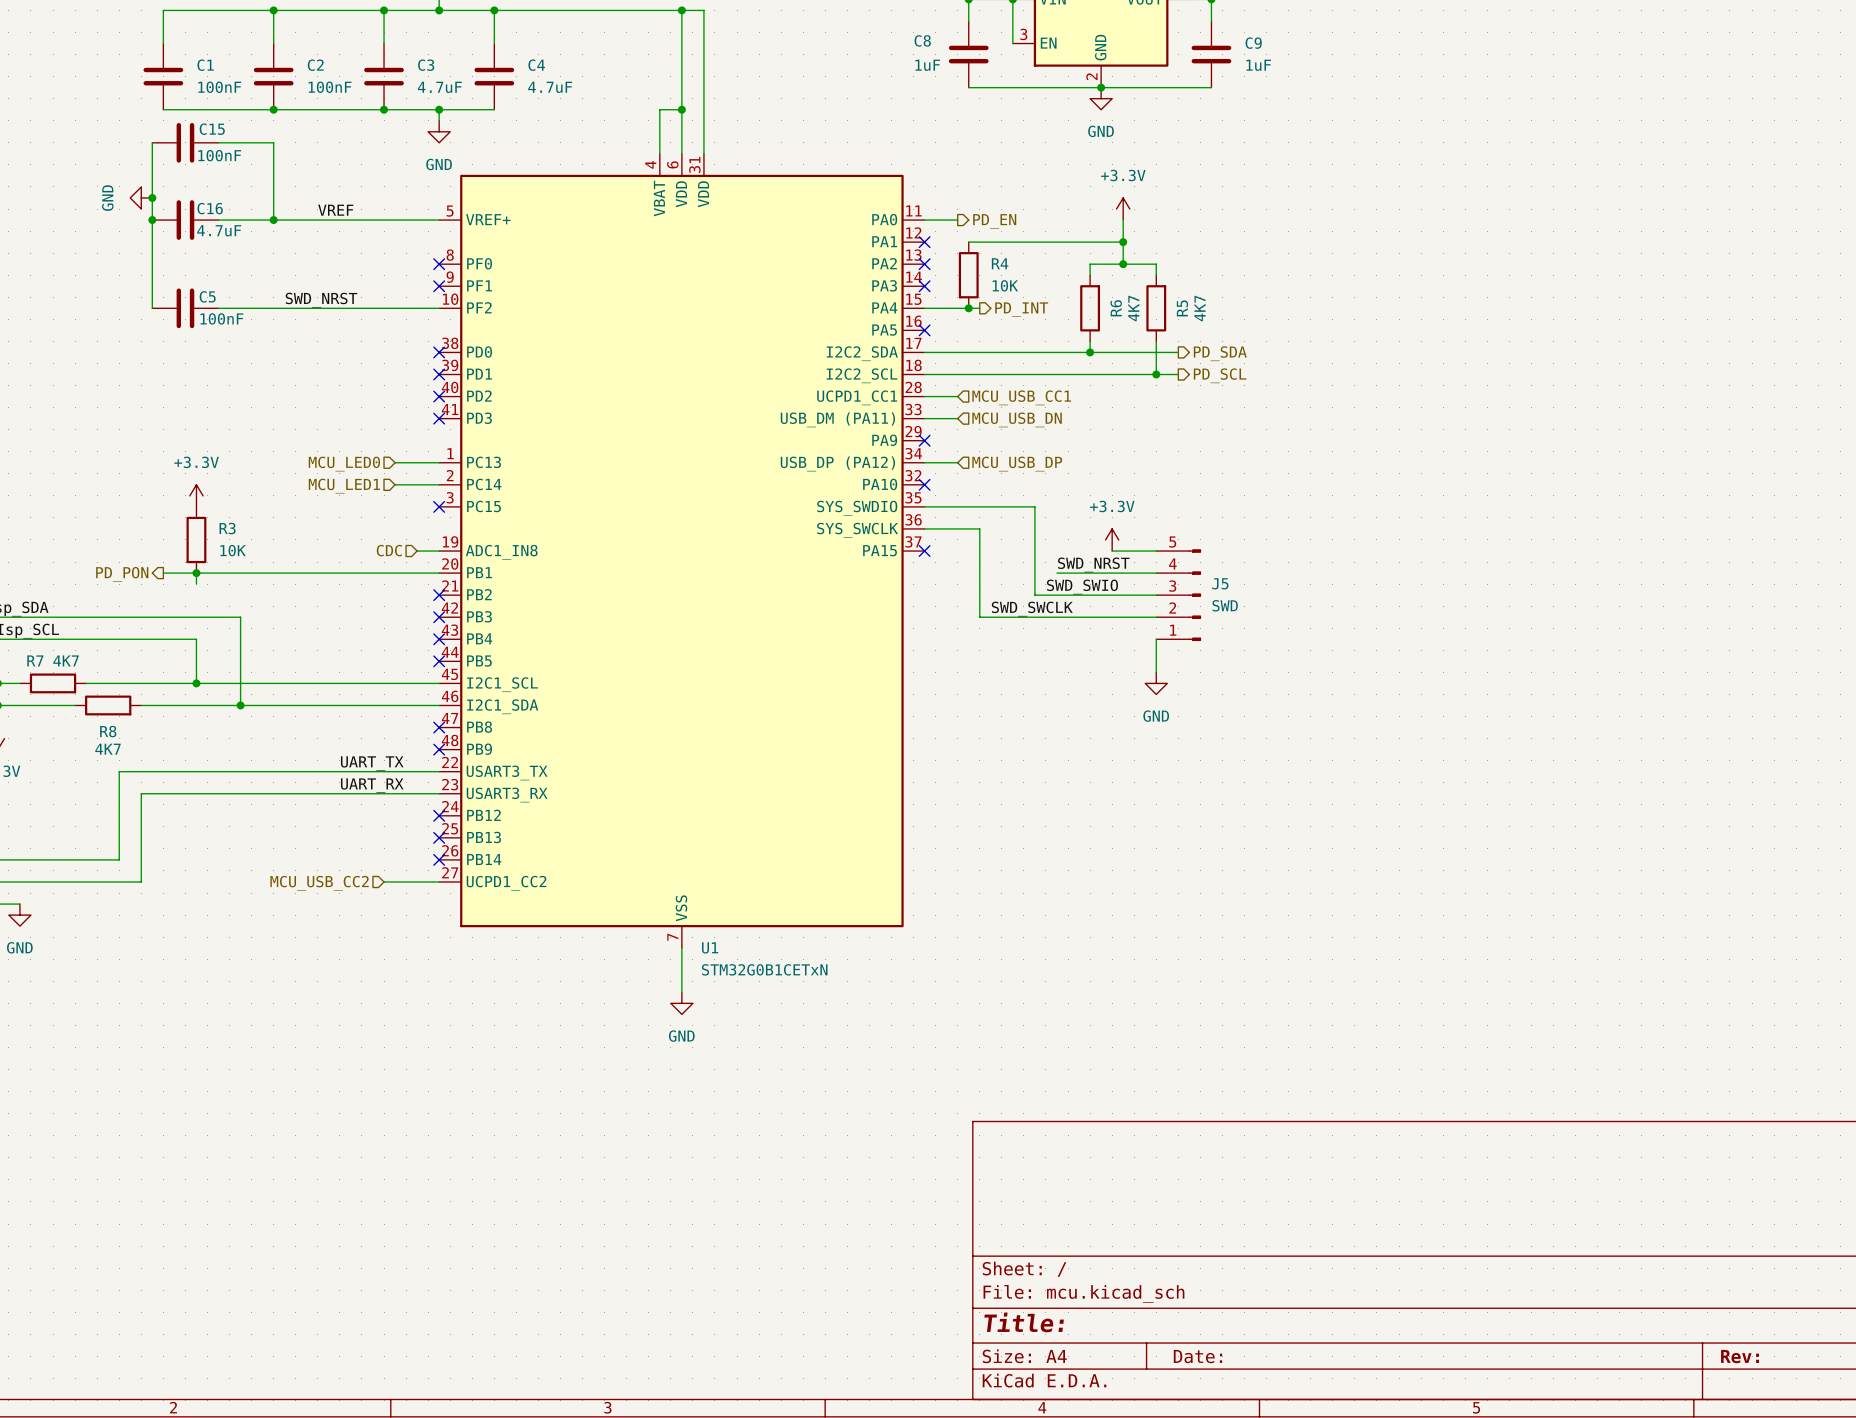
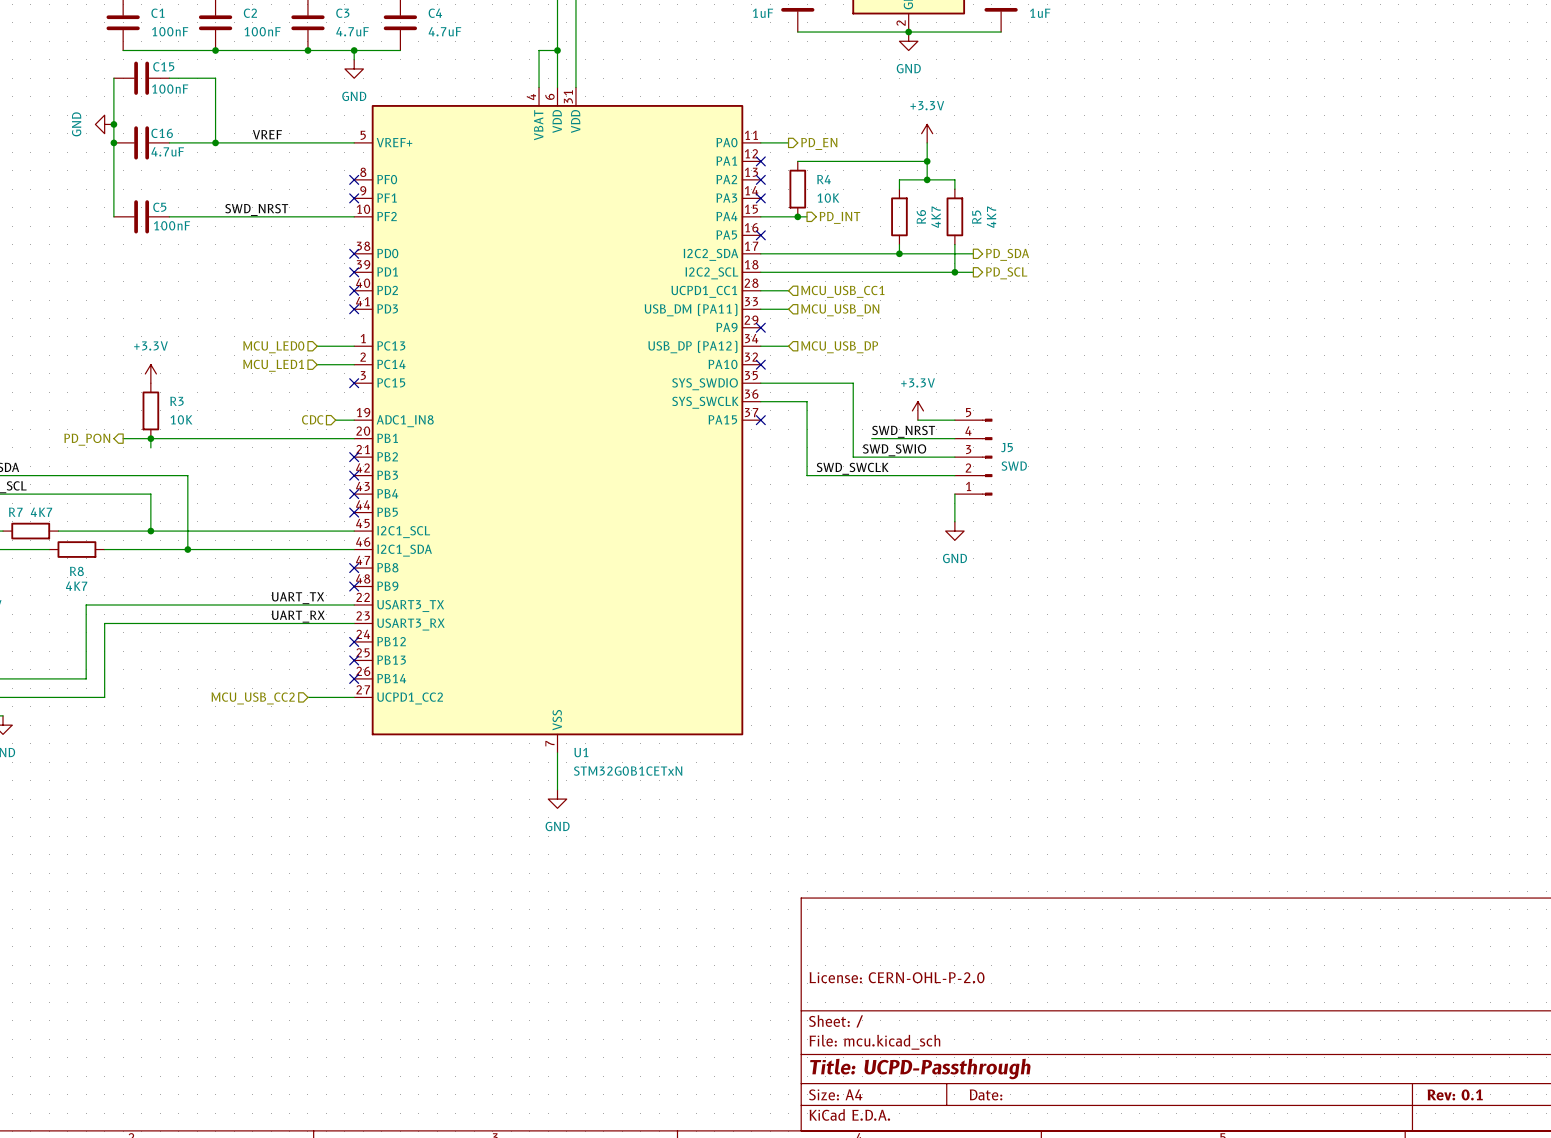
title block: none -> License: CERN-OHL-P-2.0 (897, 977)
title block: Title: (1024, 1322) -> Title: UCPD-Passthrough (920, 1069)
title block: Rev: (1740, 1356) -> Rev: 0.1 (1455, 1094)

